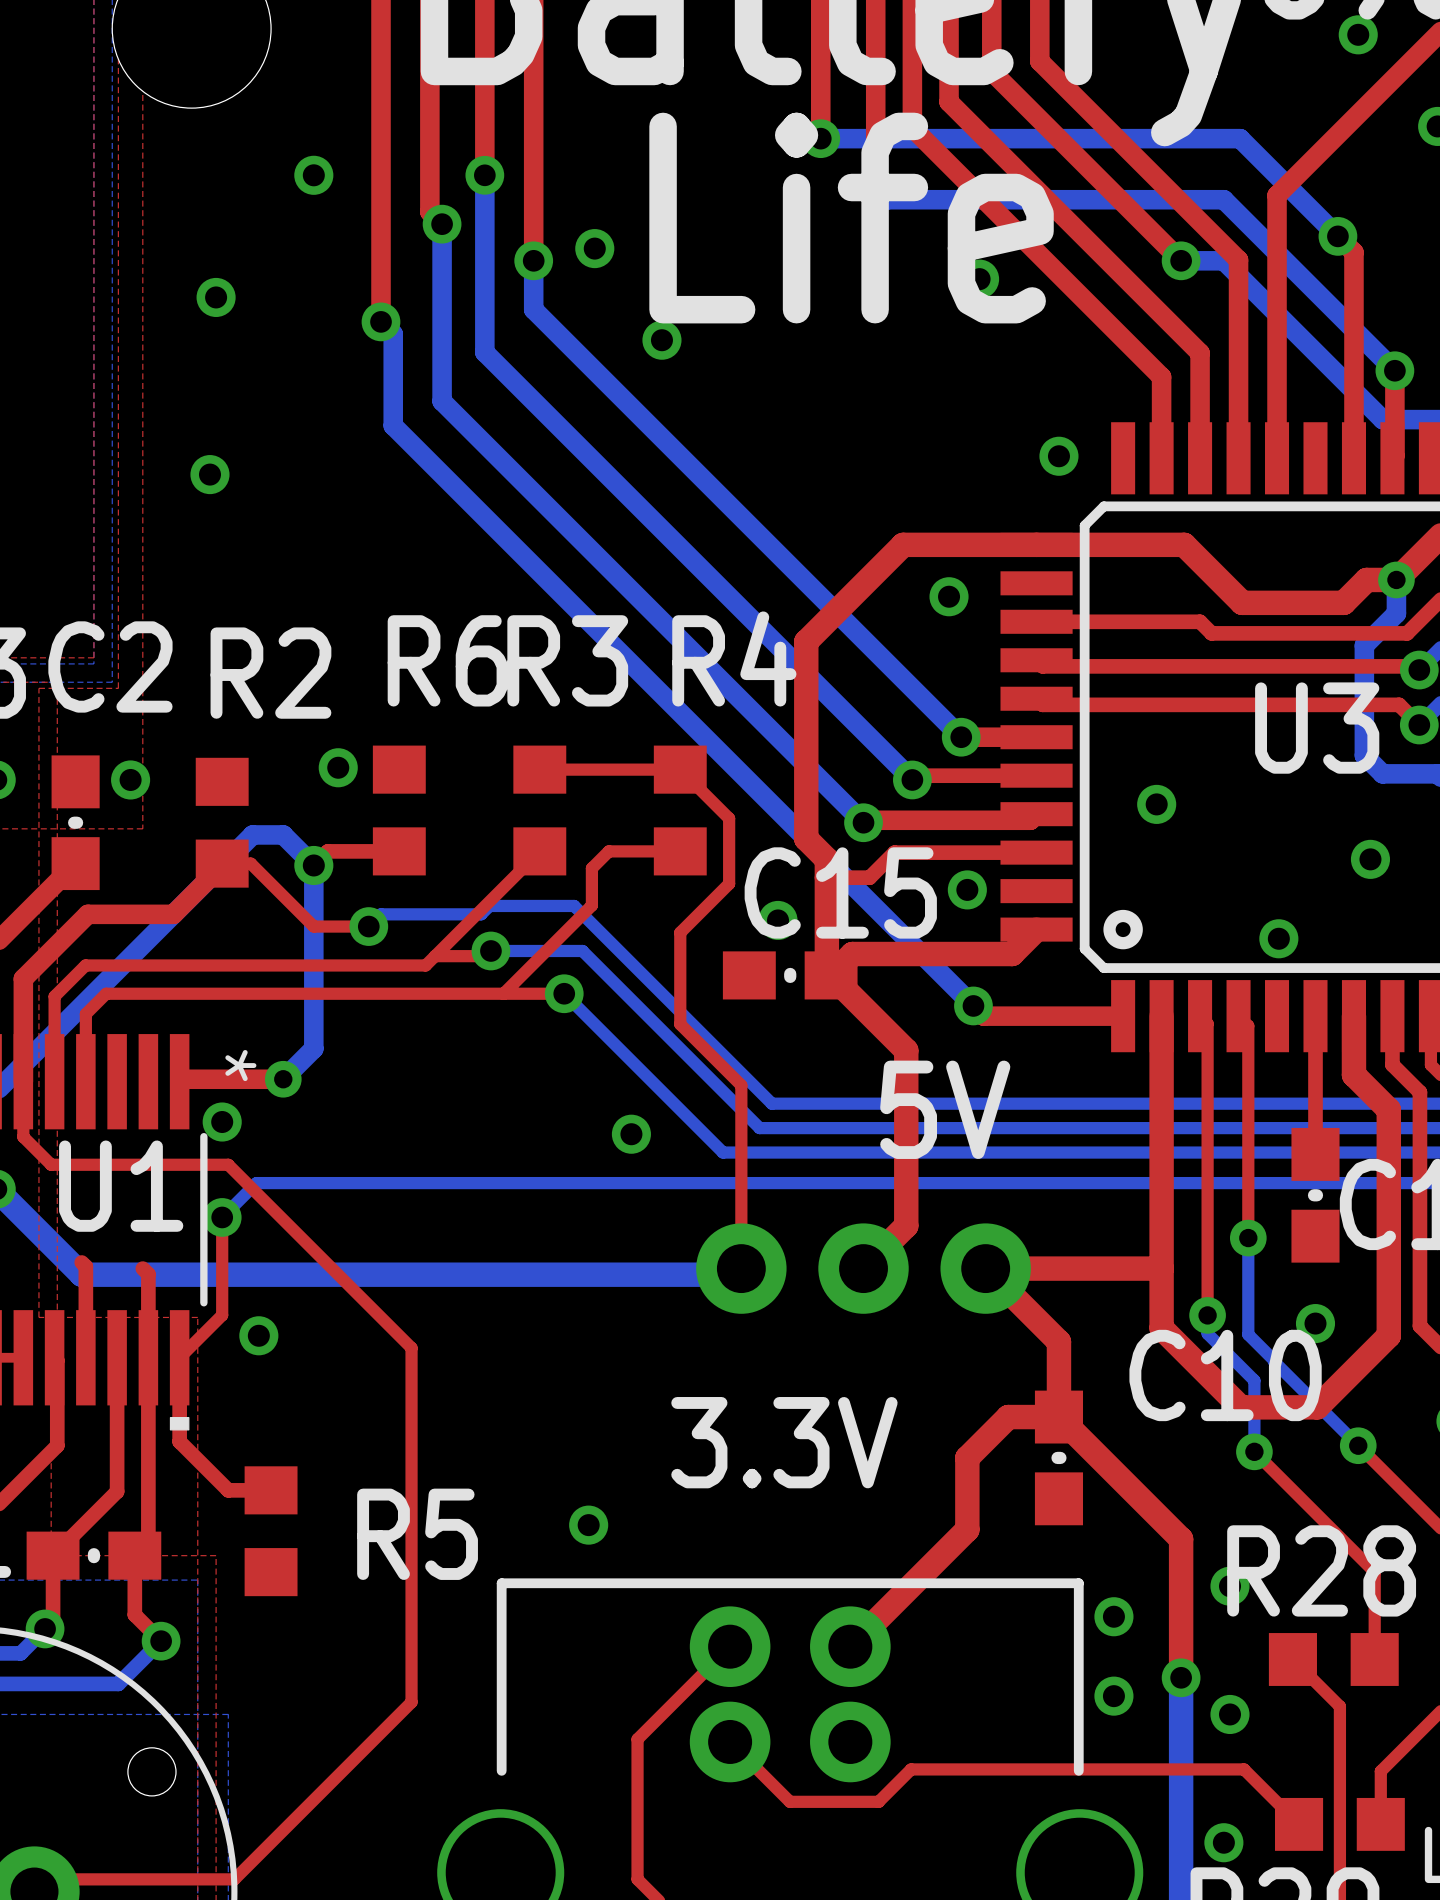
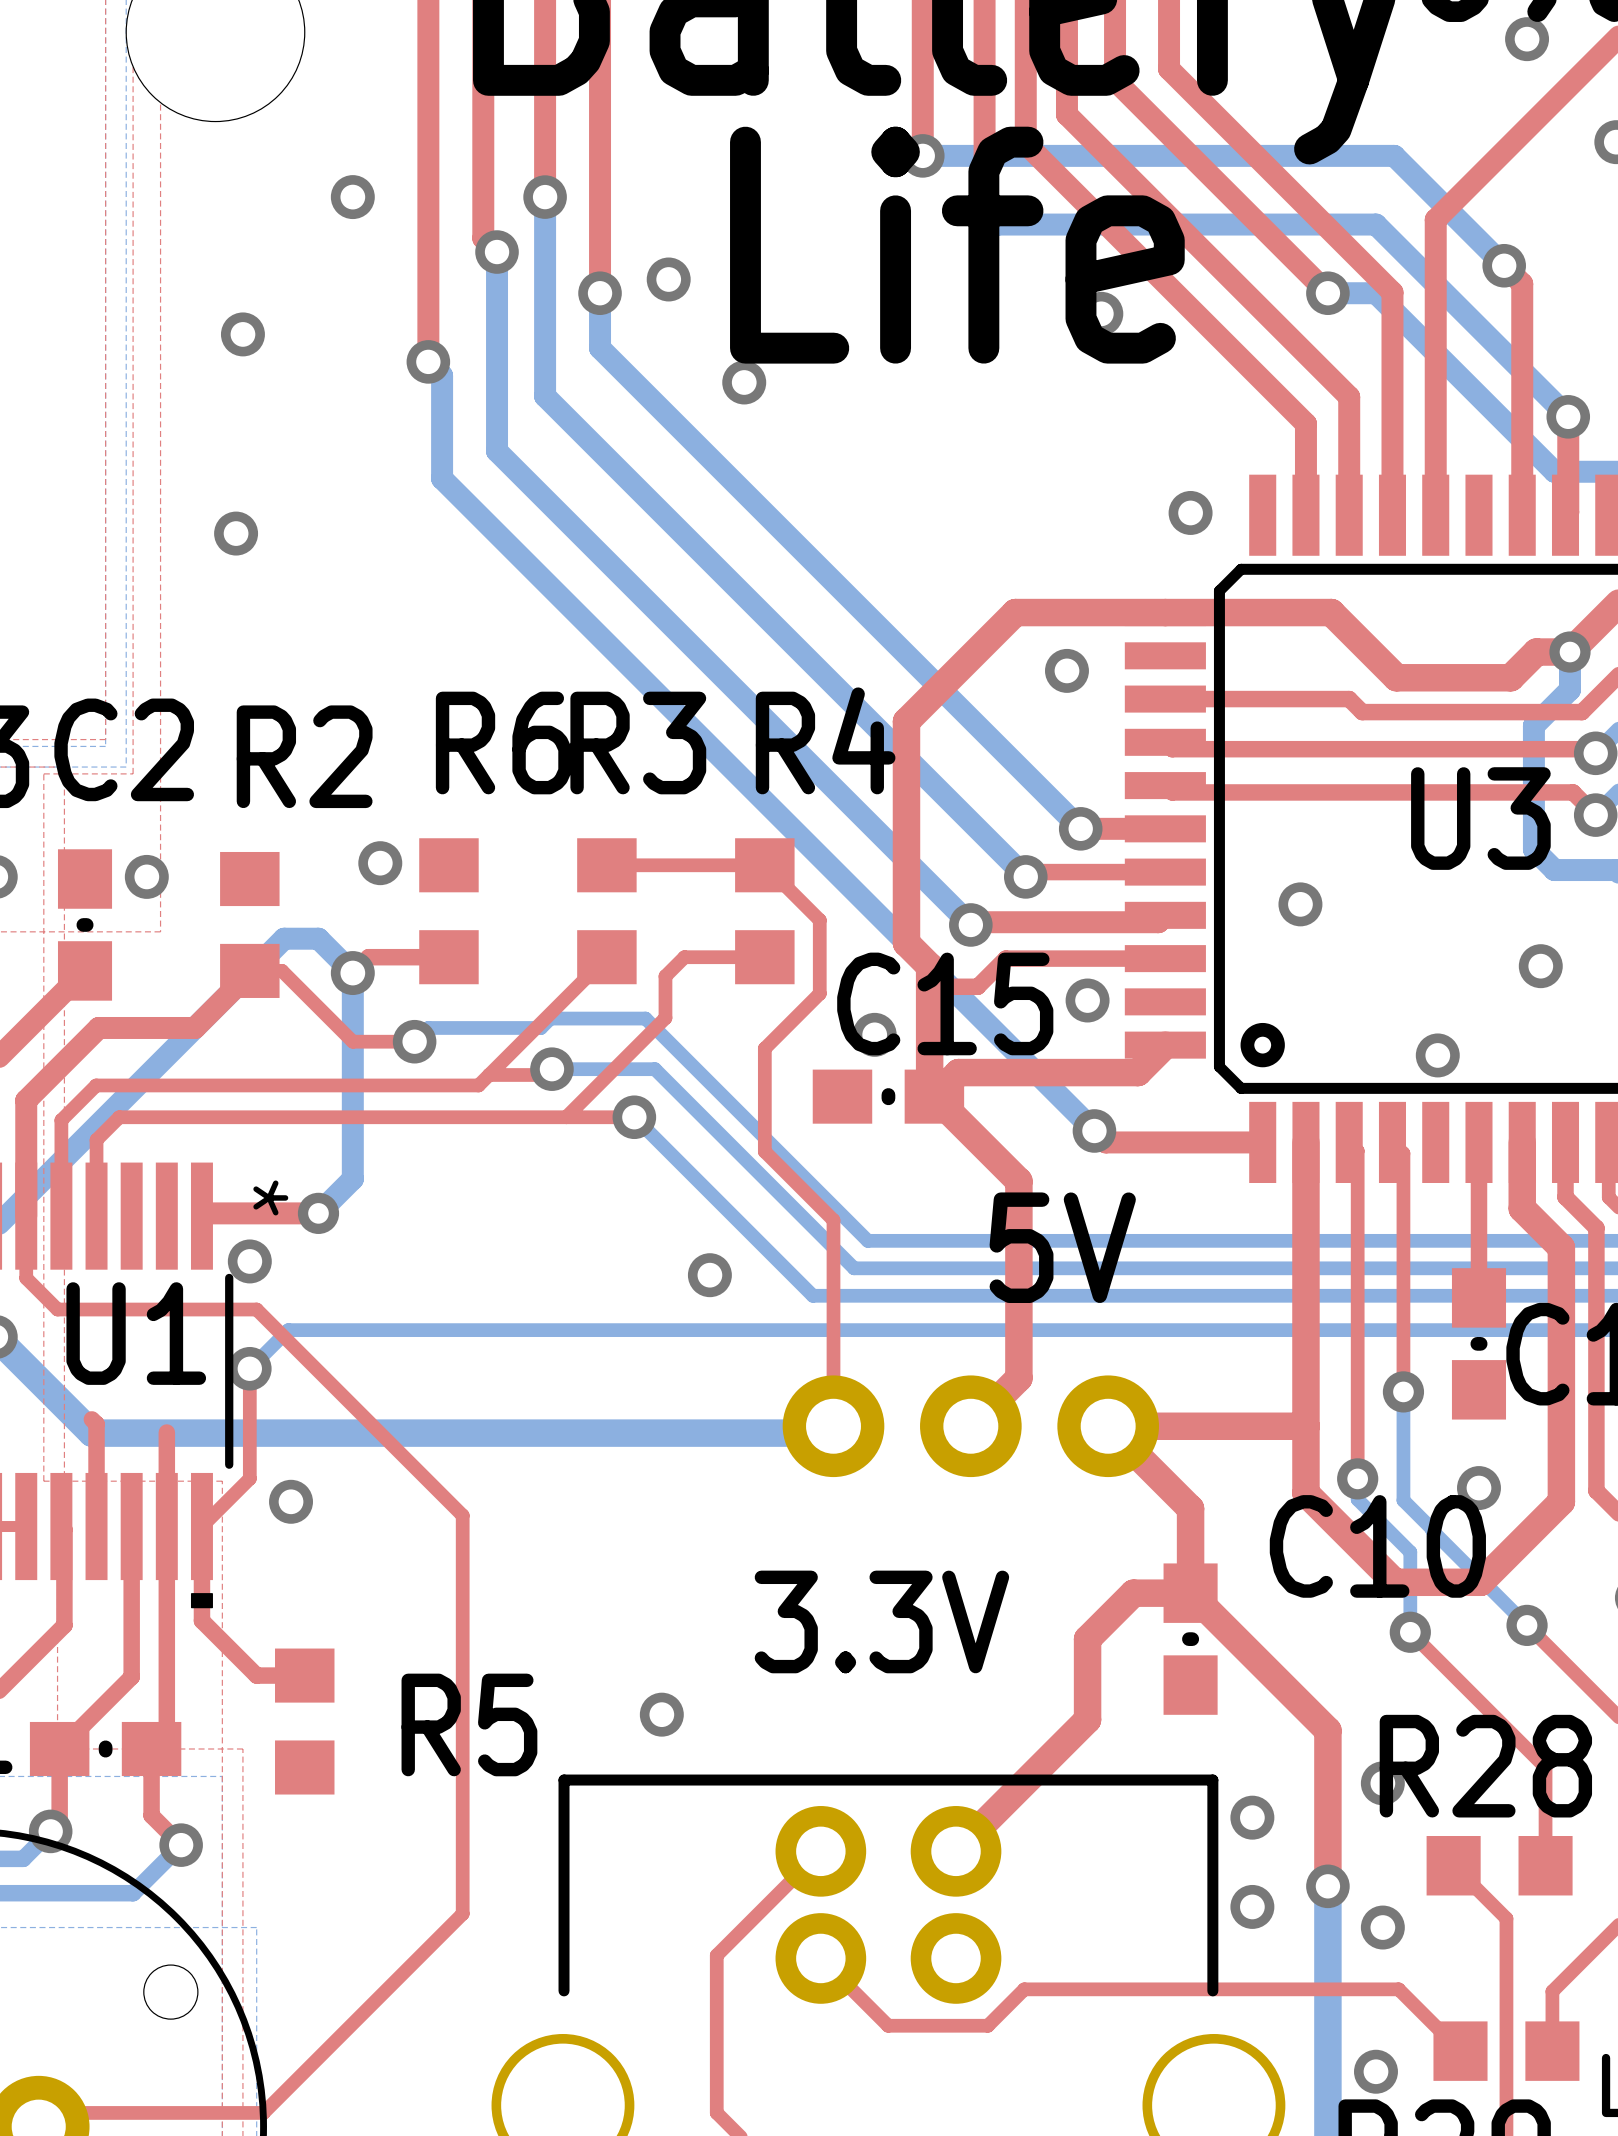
top track: (142, 1268) (148, 1274) -> none

